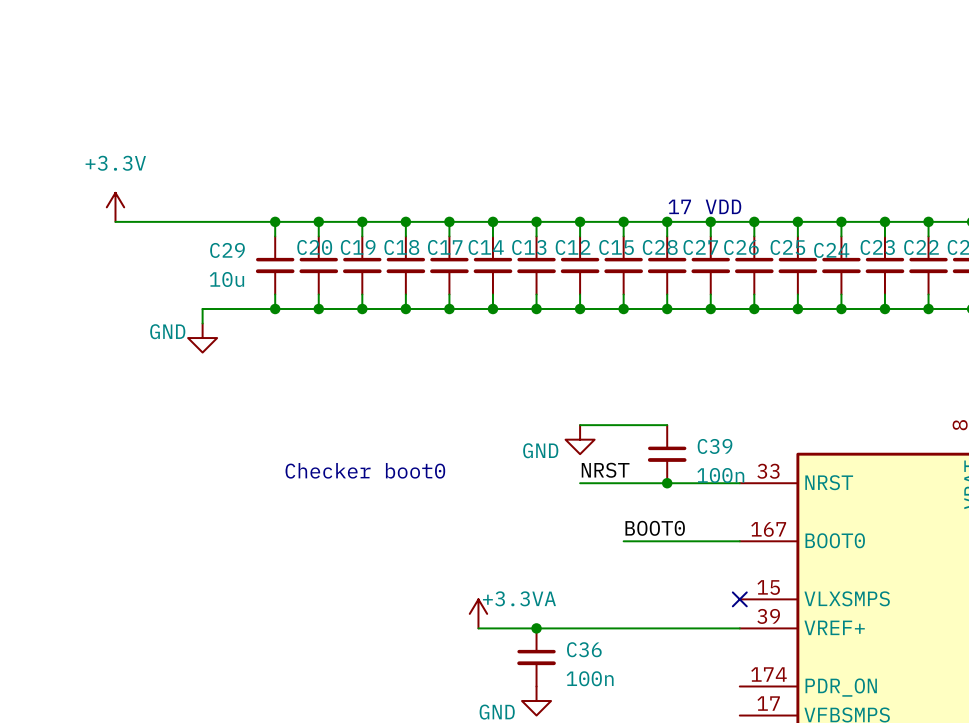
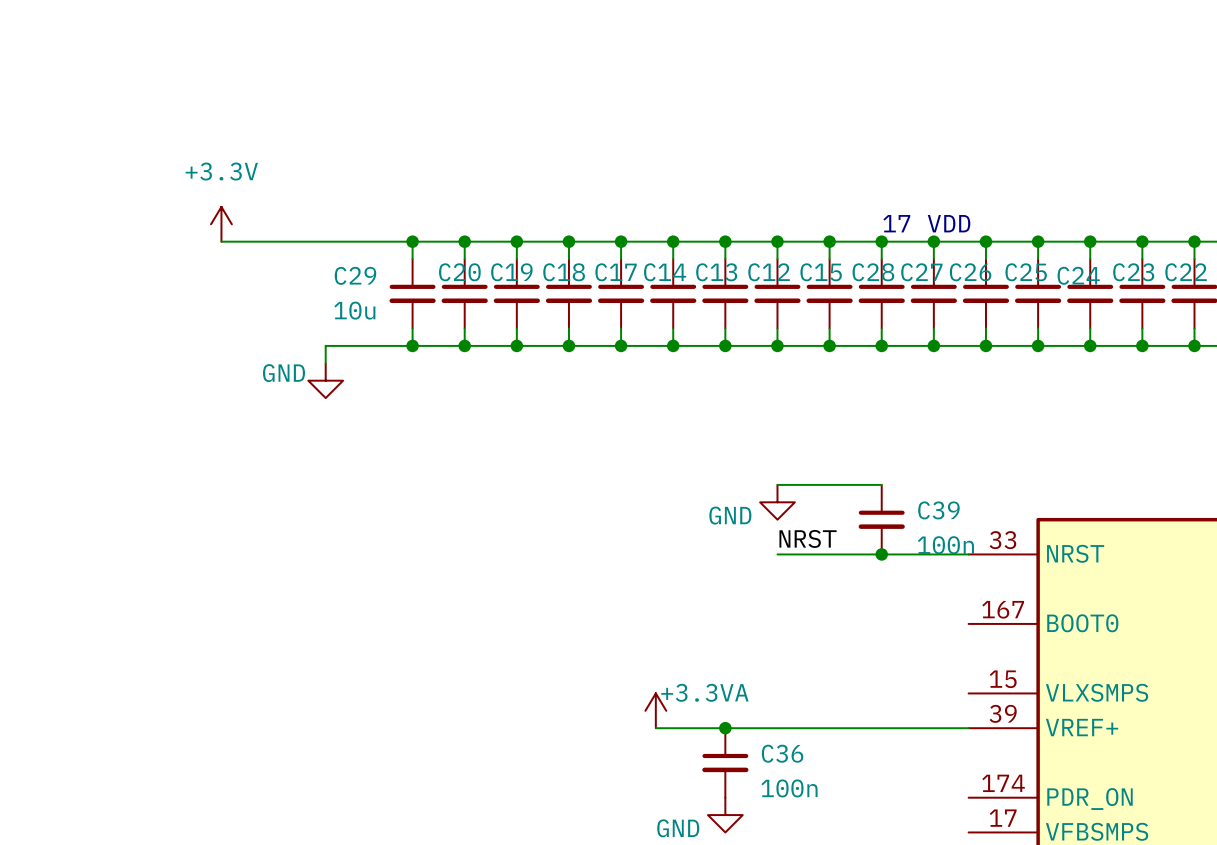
text: Checker boot0 (365, 470) -> none
label: BOOT0 (655, 528) -> none
wire: (623, 541) (739, 541) -> none
no-connect mark: (739, 599) -> none

